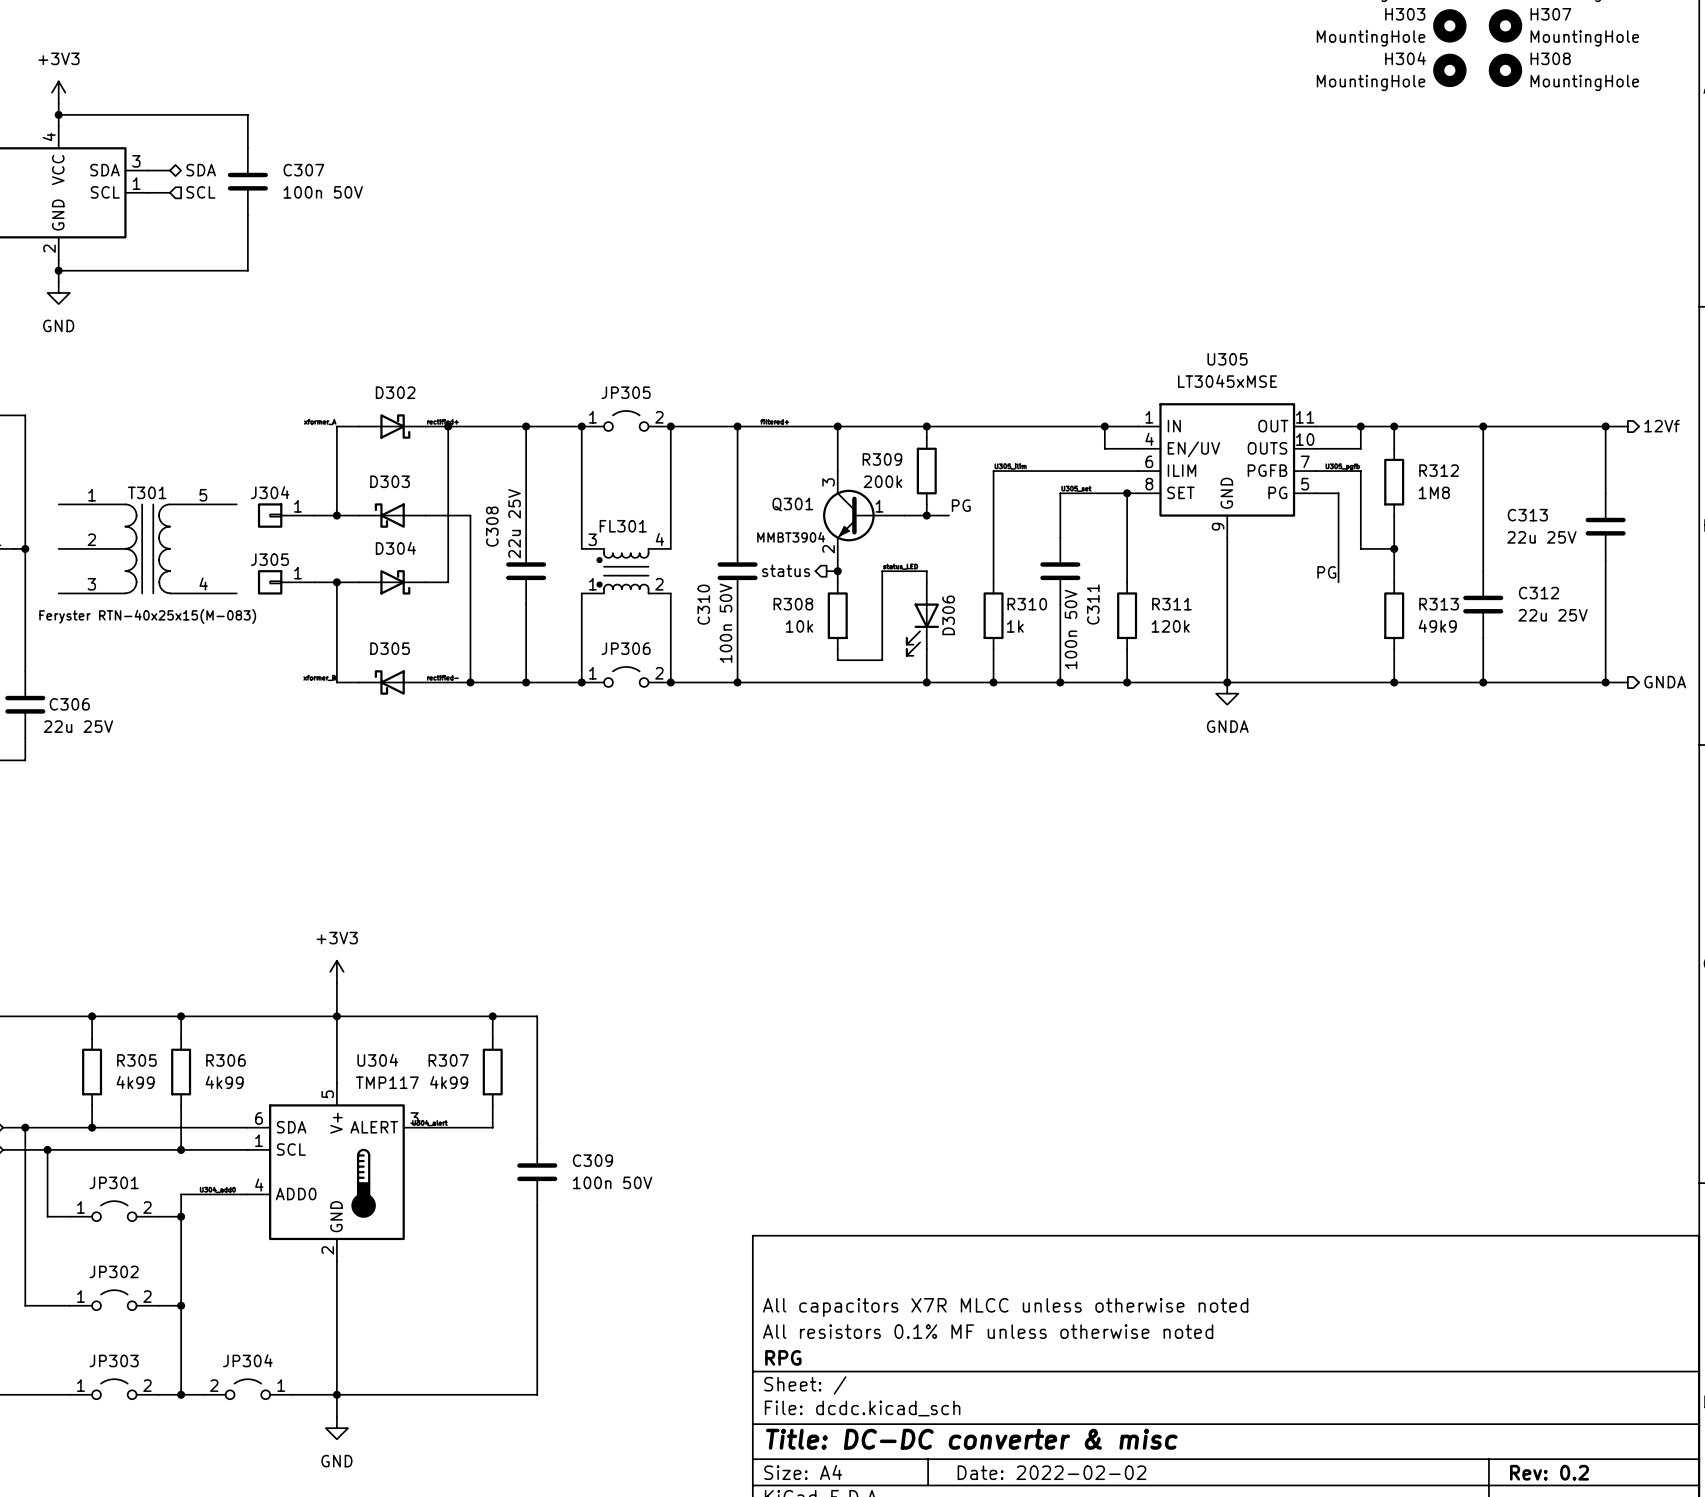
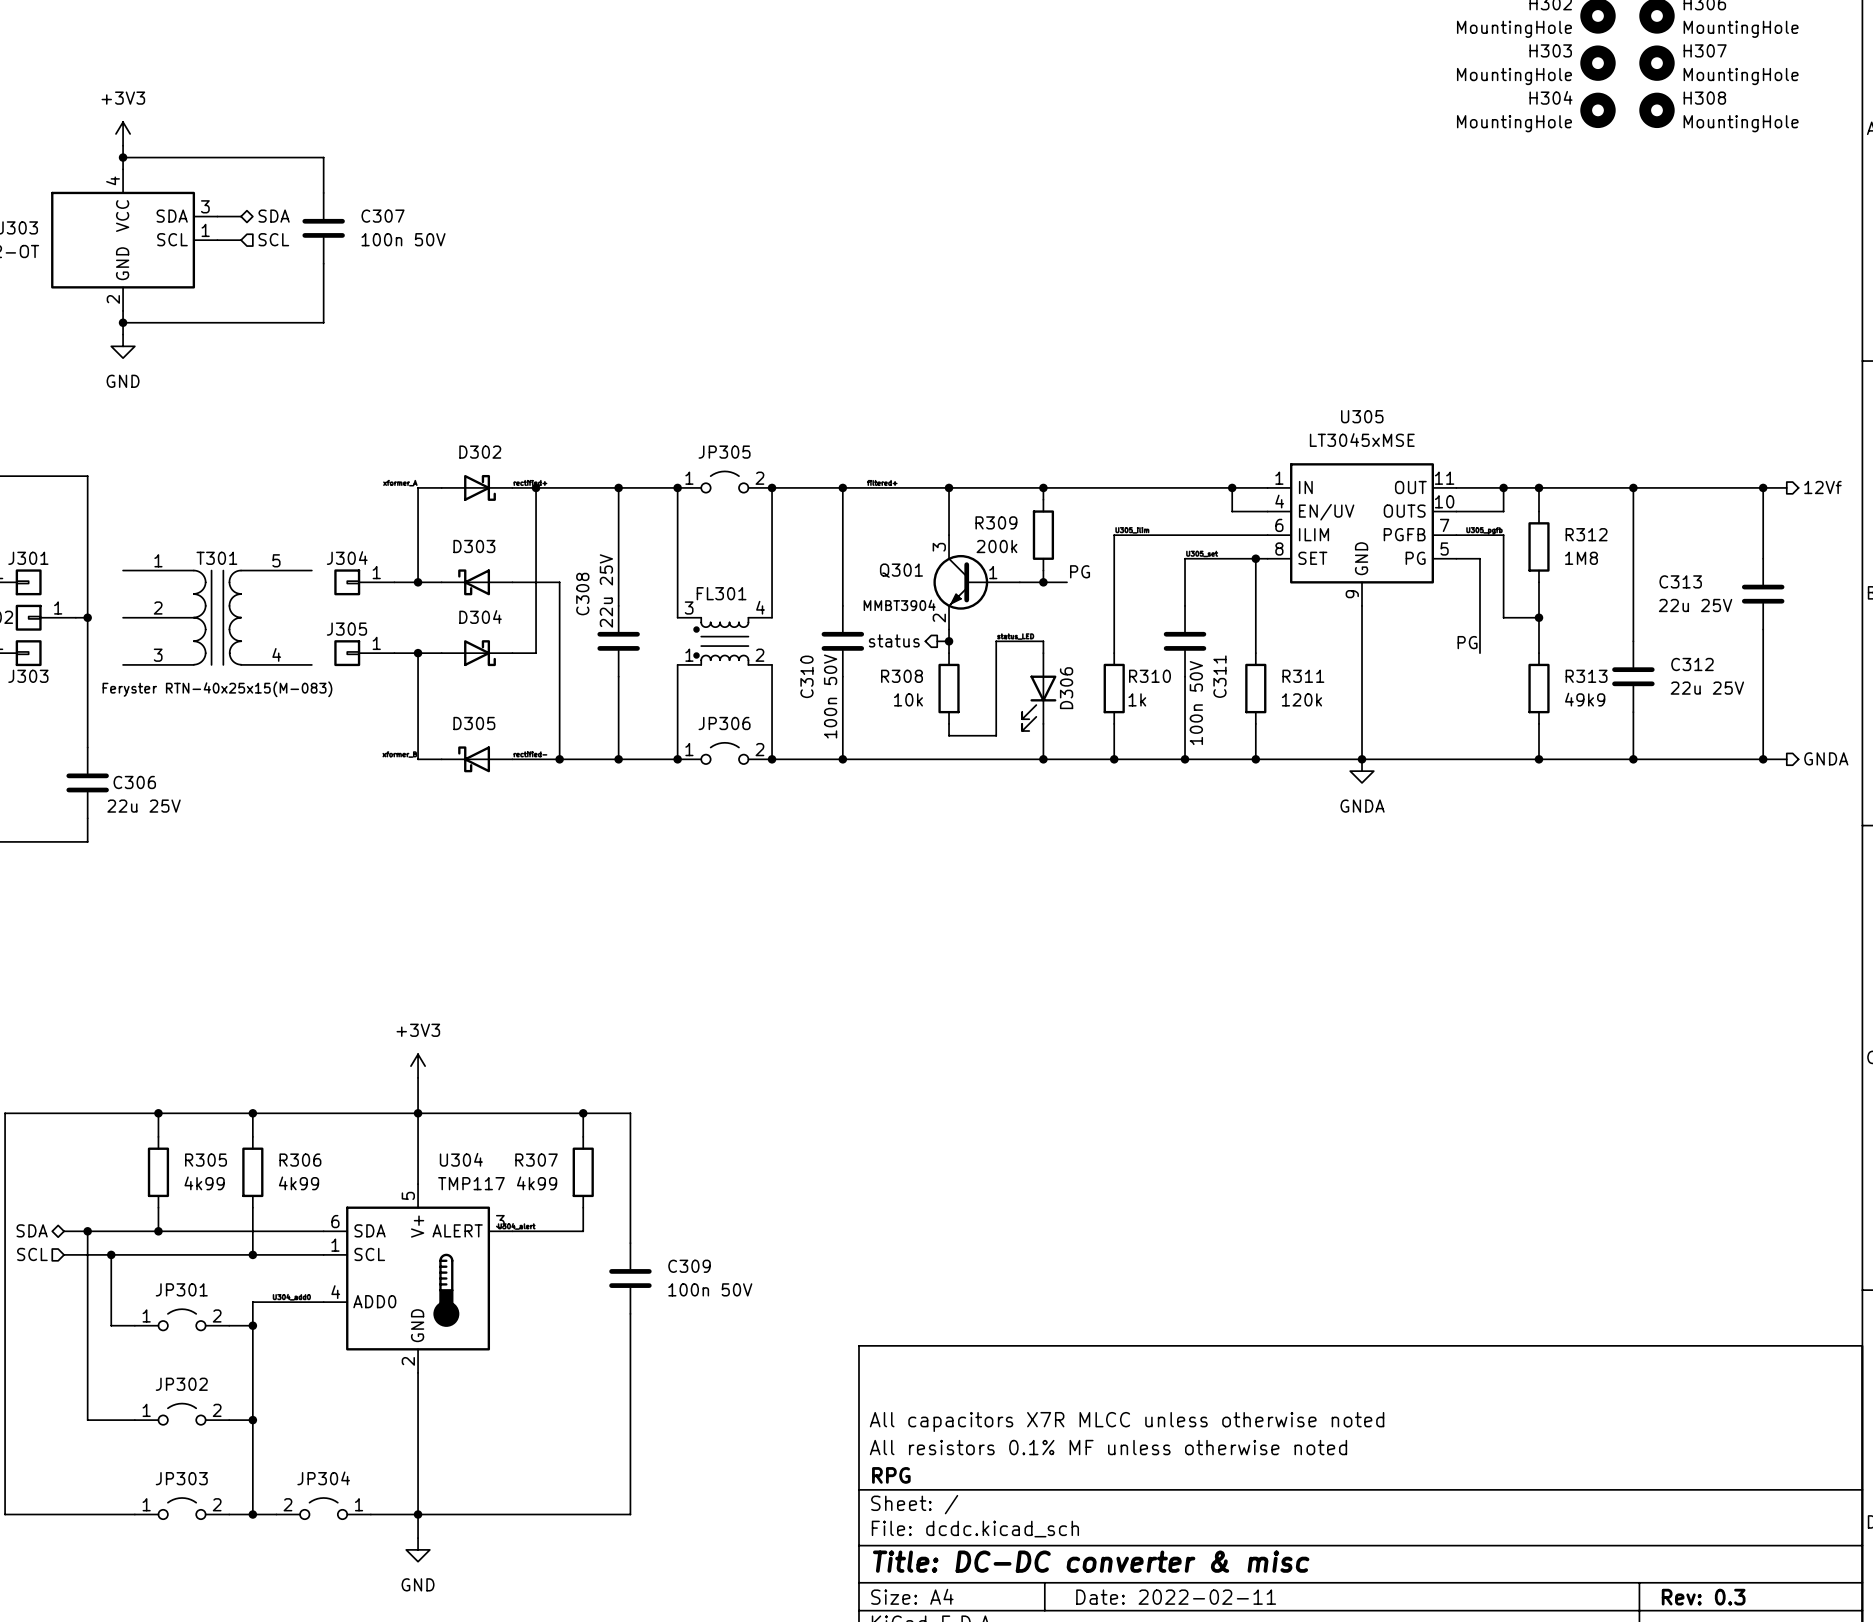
title block: Date: 2022-02-02 (1051, 1472) -> Date: 2022-02-11 (1176, 1597)
title block: Rev: 0.2 (1549, 1472) -> Rev: 0.3 (1703, 1597)

